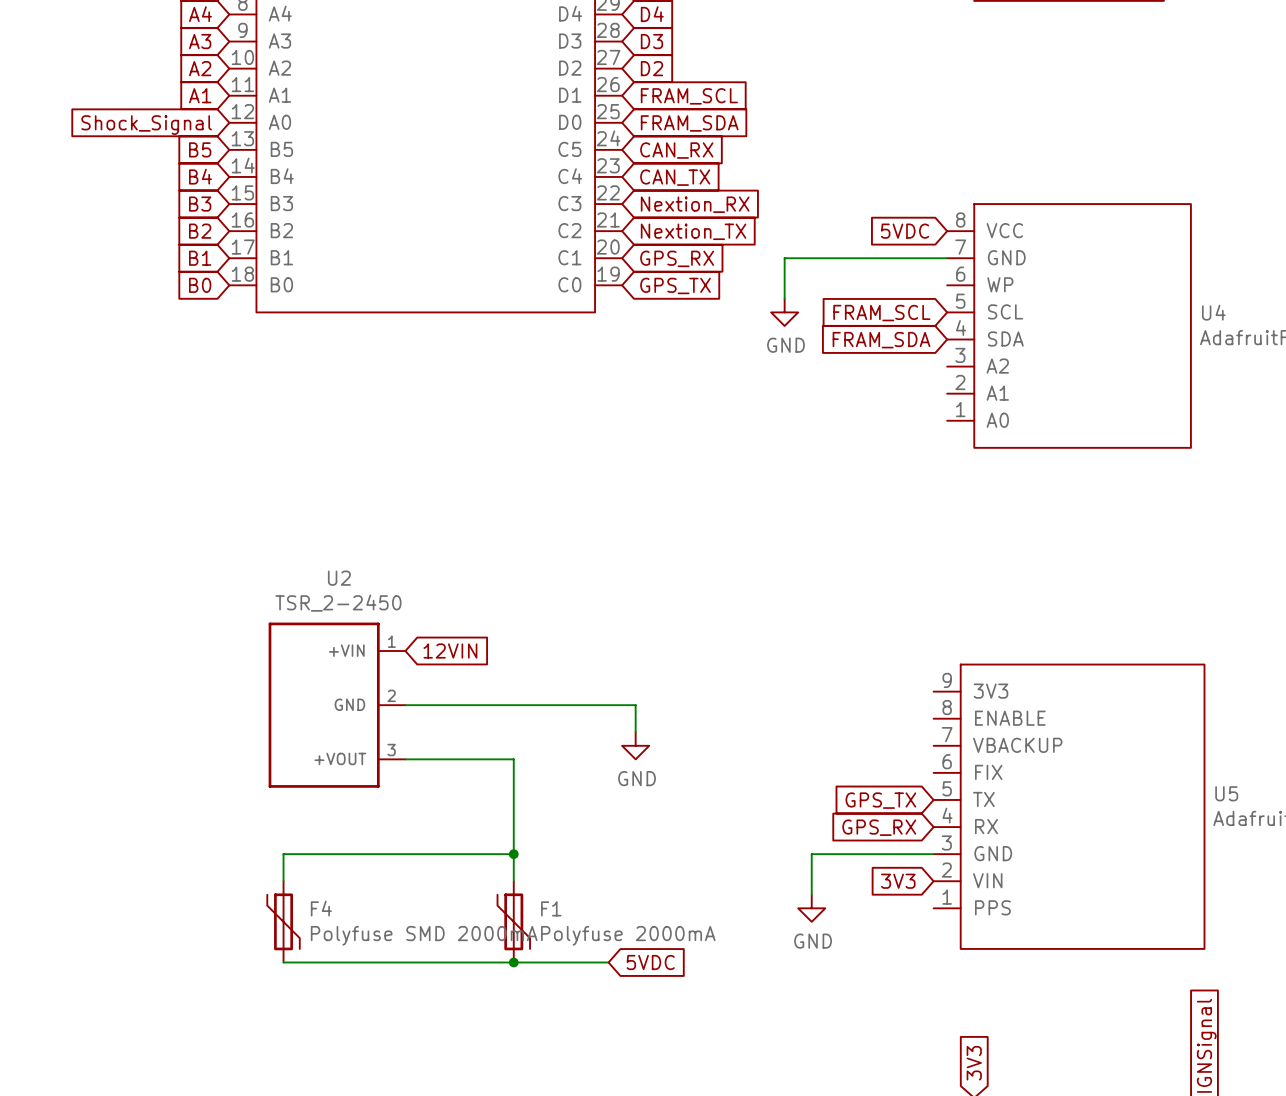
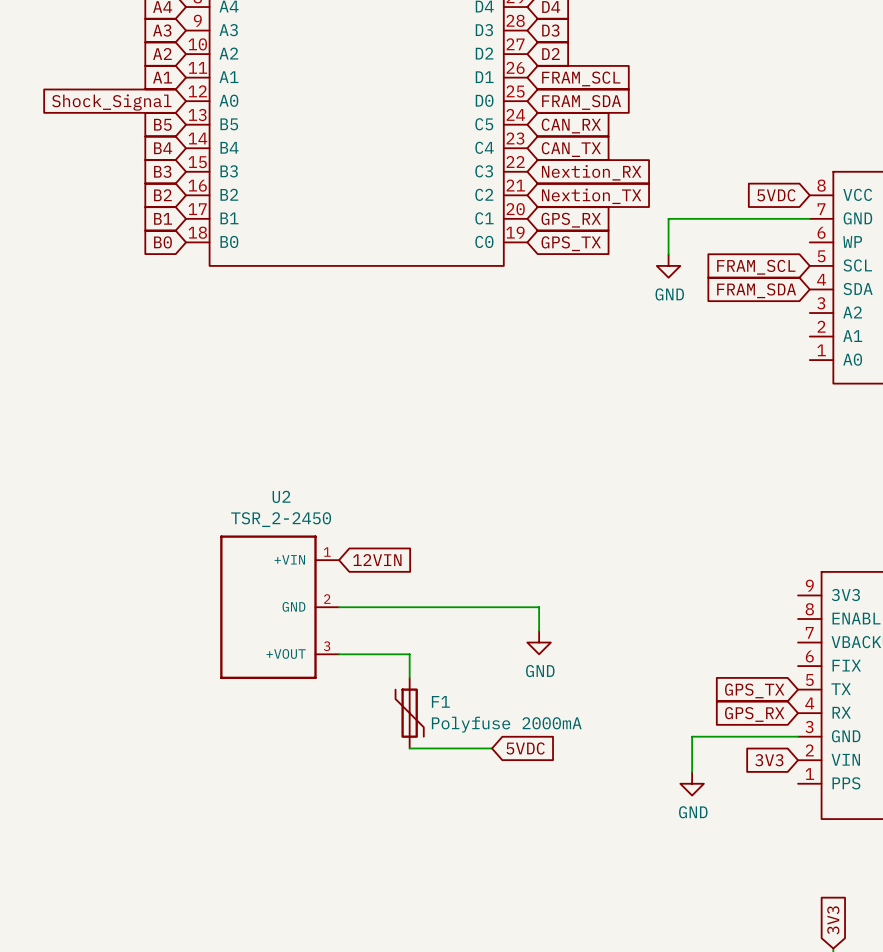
wire: (486, 759) (513, 759) (513, 881) -> (409, 654) (409, 677)
wire: (513, 854) (283, 854) (283, 881) -> none
junction: (513, 854) -> none
wire: none -> (409, 748) (492, 748)
F4: Polyfuse SMD 2000mA (283, 921) -> none
F1 position: (513, 921) -> (409, 713)
wire: (283, 962) (608, 962) -> none
junction: (513, 962) -> none
global label position: 5VDC (650, 962) -> 5VDC (525, 748)

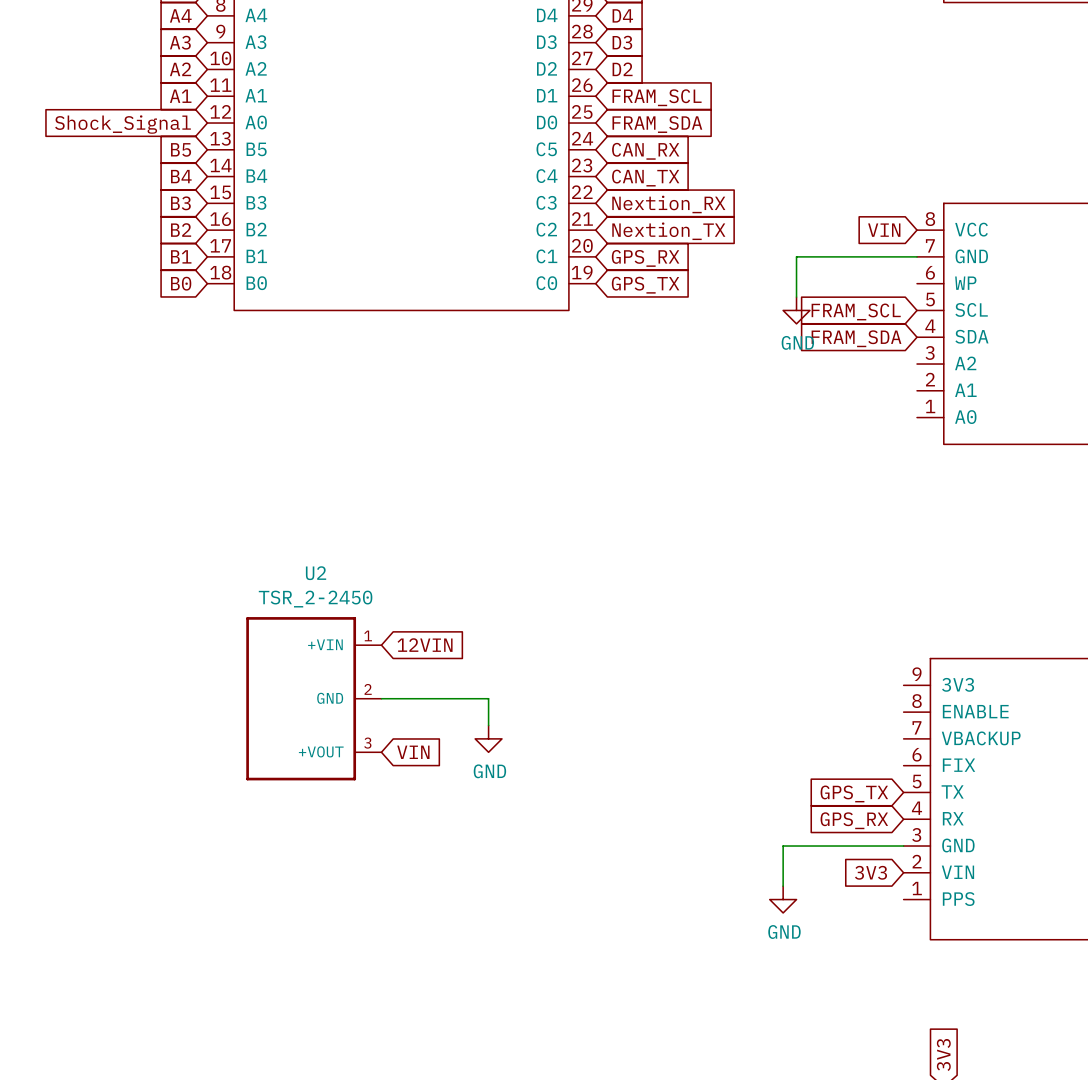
global label: 5VDC (776, 195) -> VIN (884, 230)
wire: (703, 218) (668, 218) (668, 254) -> (796, 256) (796, 297)
power symbol position: GND (668, 265) -> GND (796, 310)
wire: (433, 607) (539, 607) (539, 630) -> (488, 698) (488, 725)
power symbol position: GND (539, 642) -> GND (488, 738)
wire: (339, 654) (409, 654) (409, 677) -> none
global label: none -> VIN (413, 752)
F1: Polyfuse 2000mA (409, 713) -> none
wire: (409, 748) (492, 748) -> none
global label: 5VDC (525, 748) -> none

